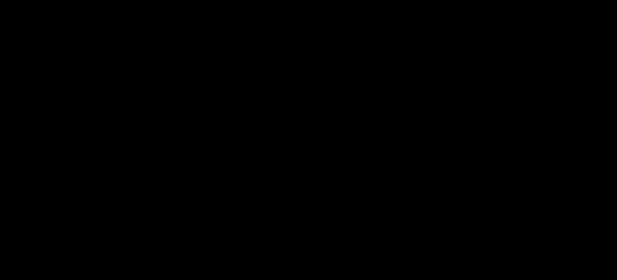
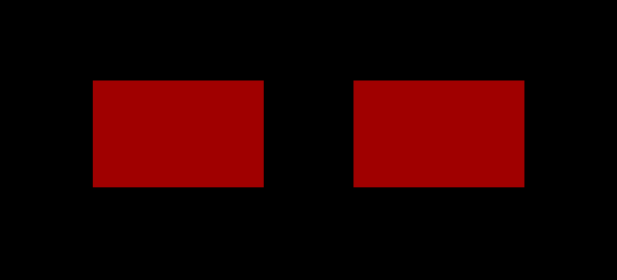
part: none -> (308, 133)

